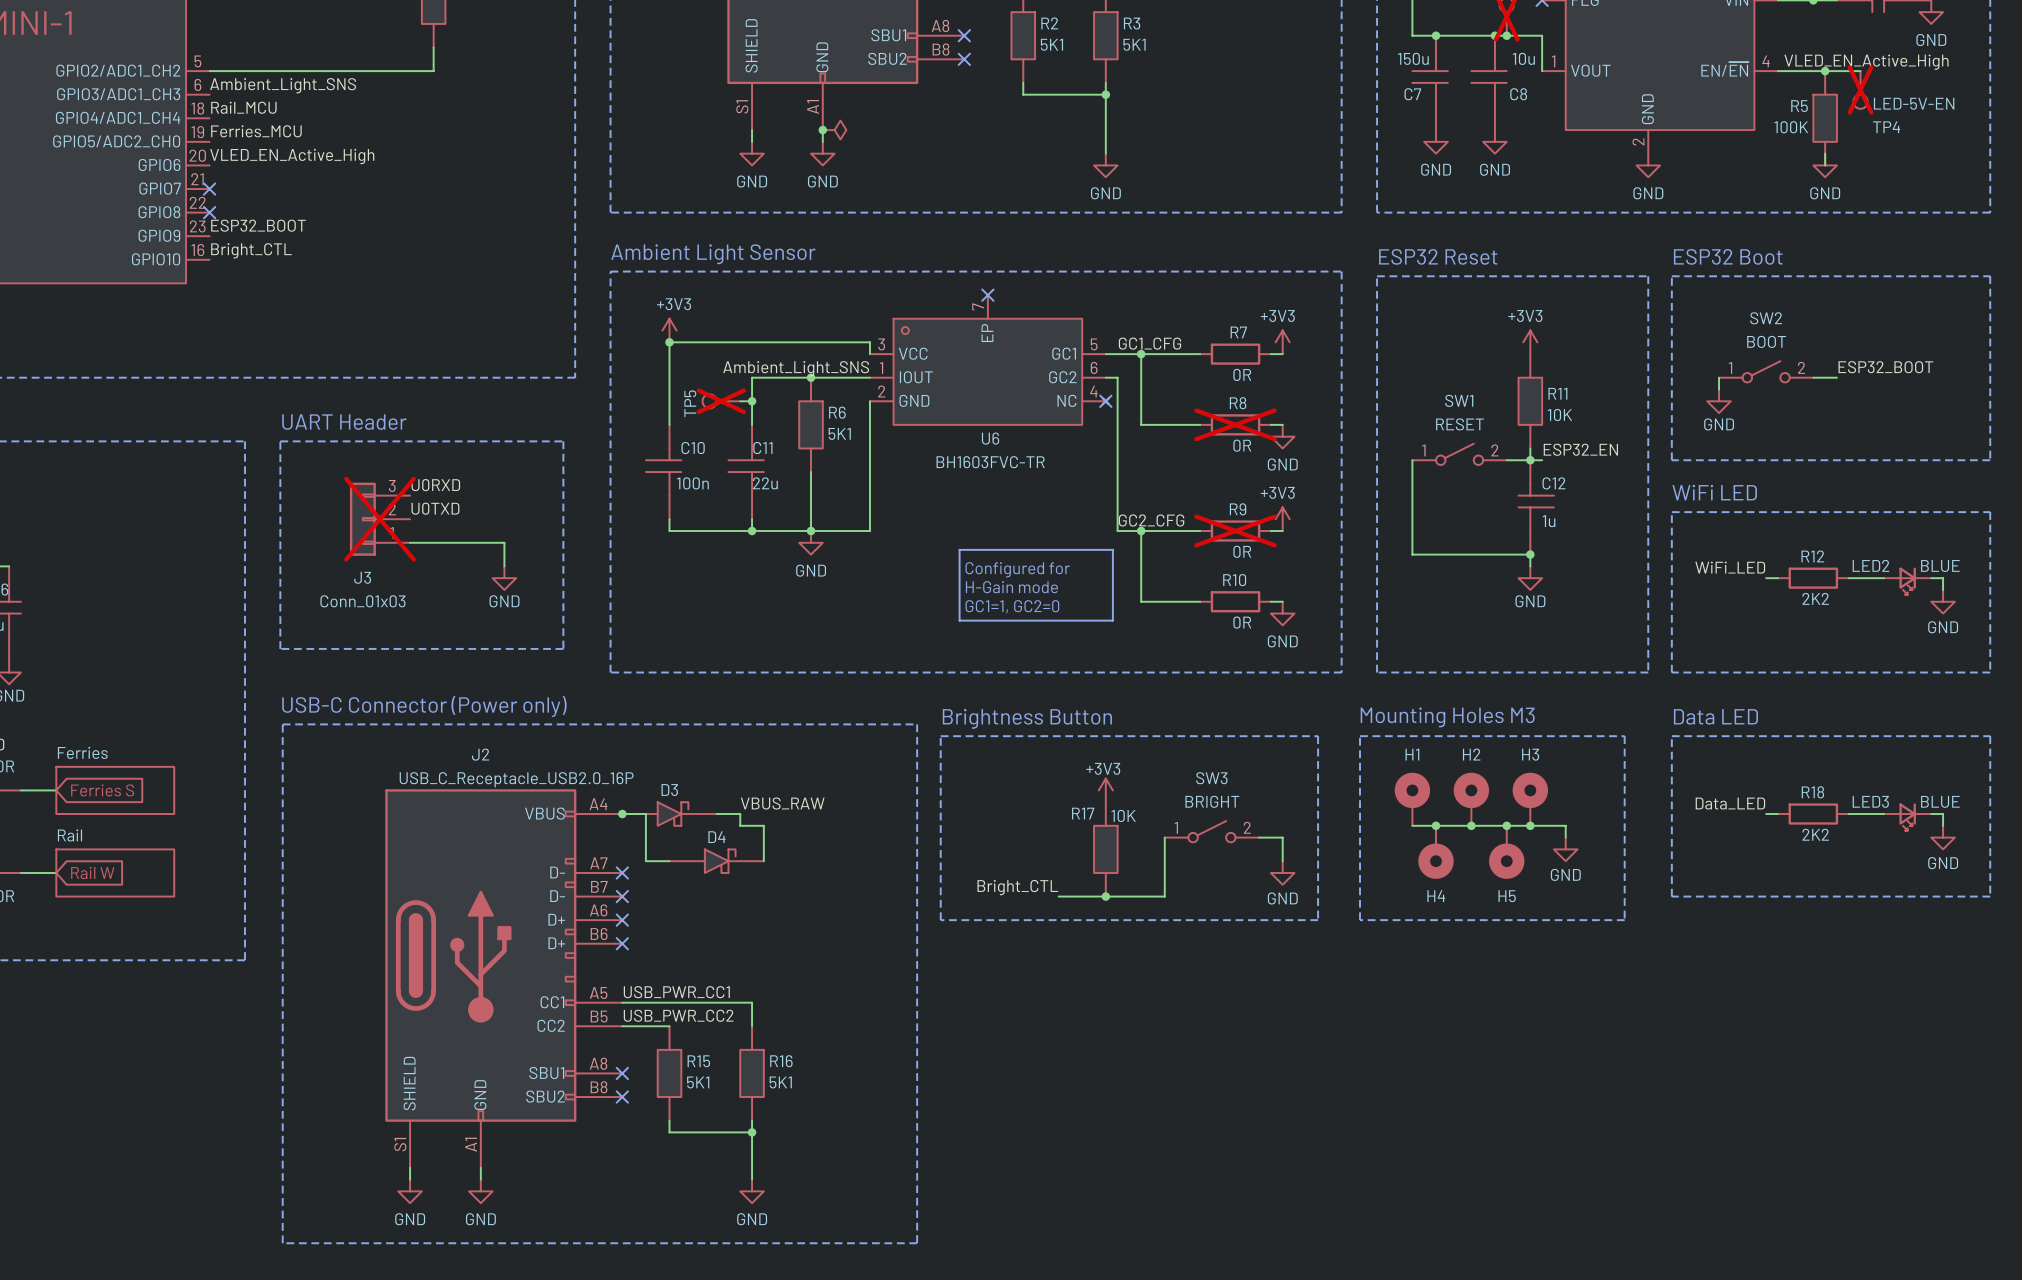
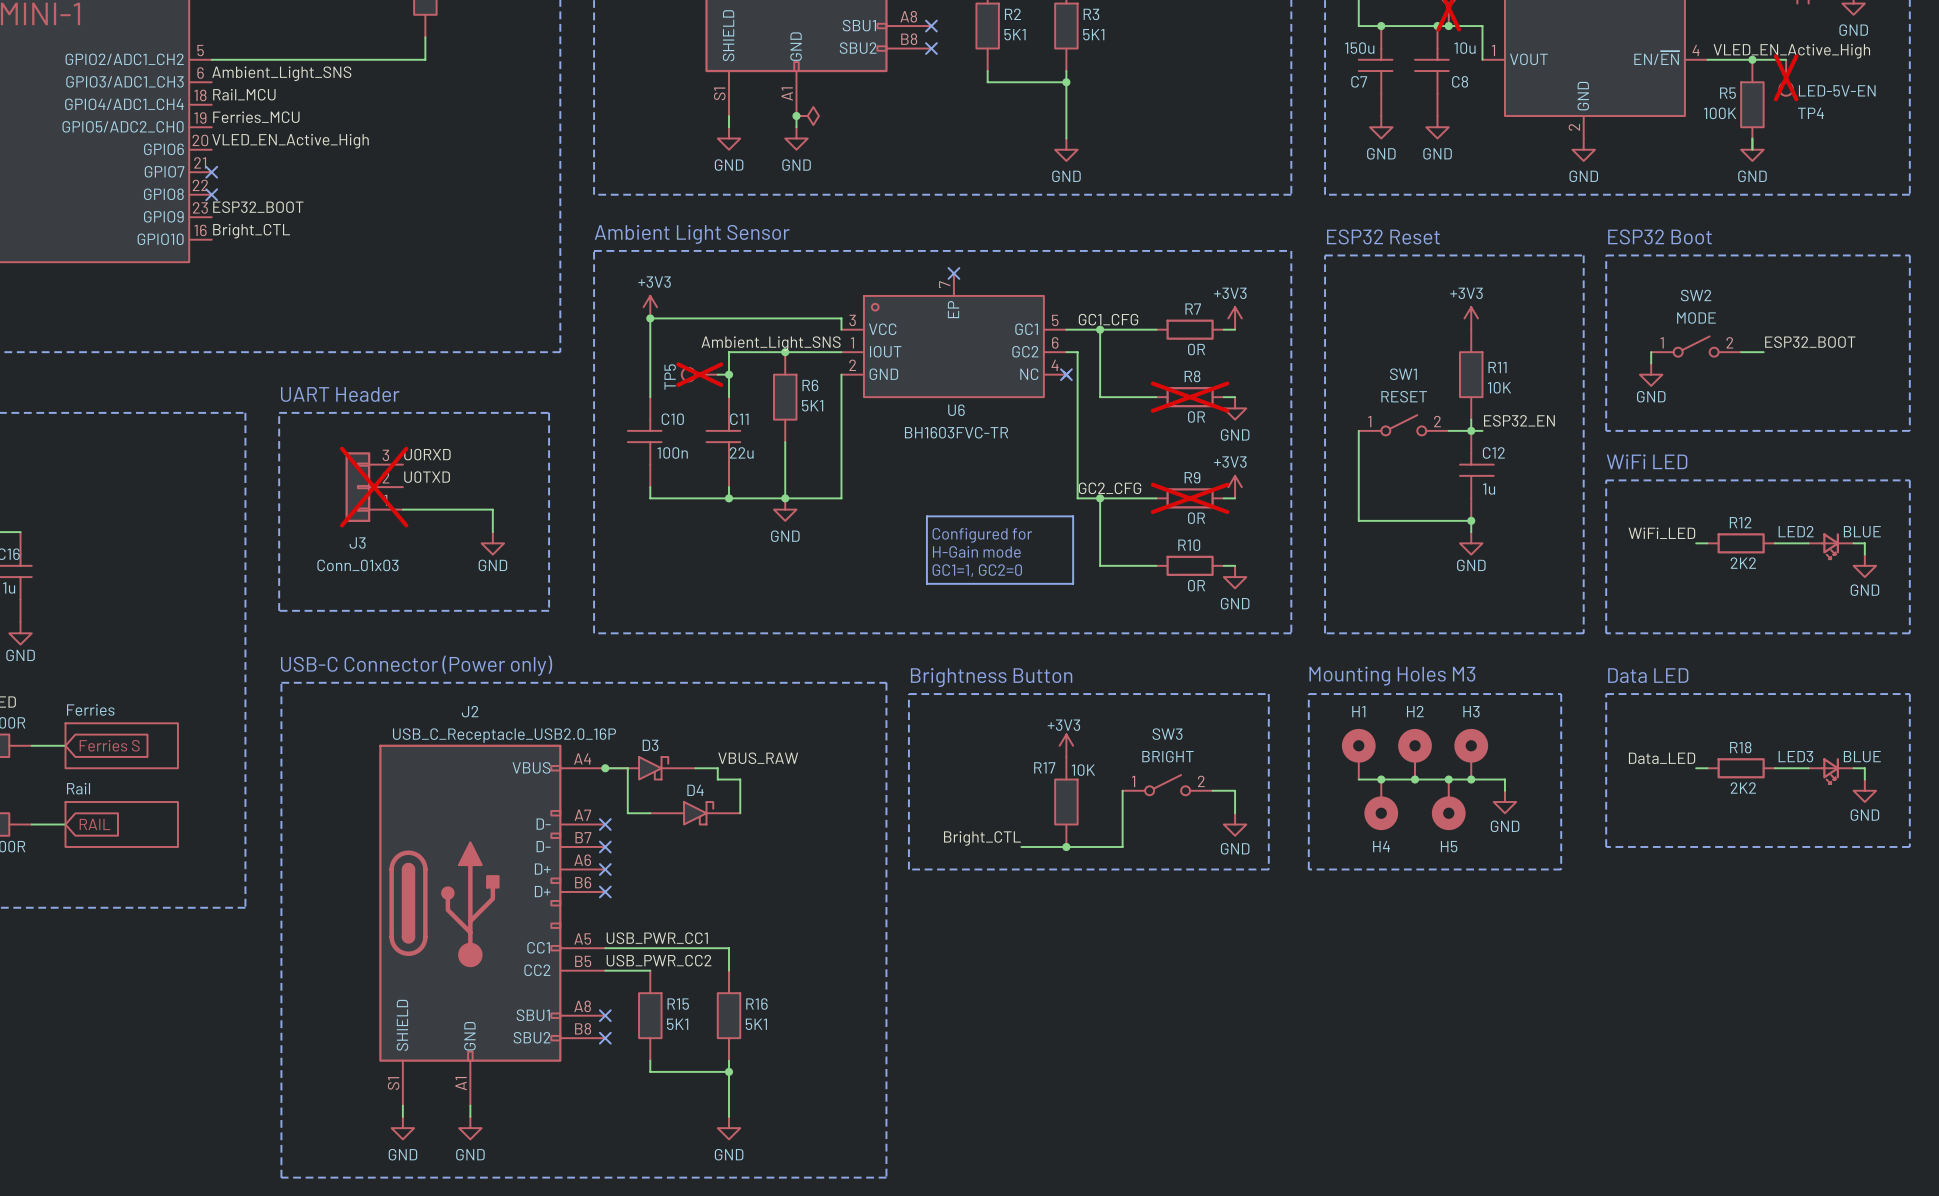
SW2 text: BOOT (1766, 341) -> MODE (1696, 318)
global label: Rail W (92, 872) -> RAIL (95, 824)

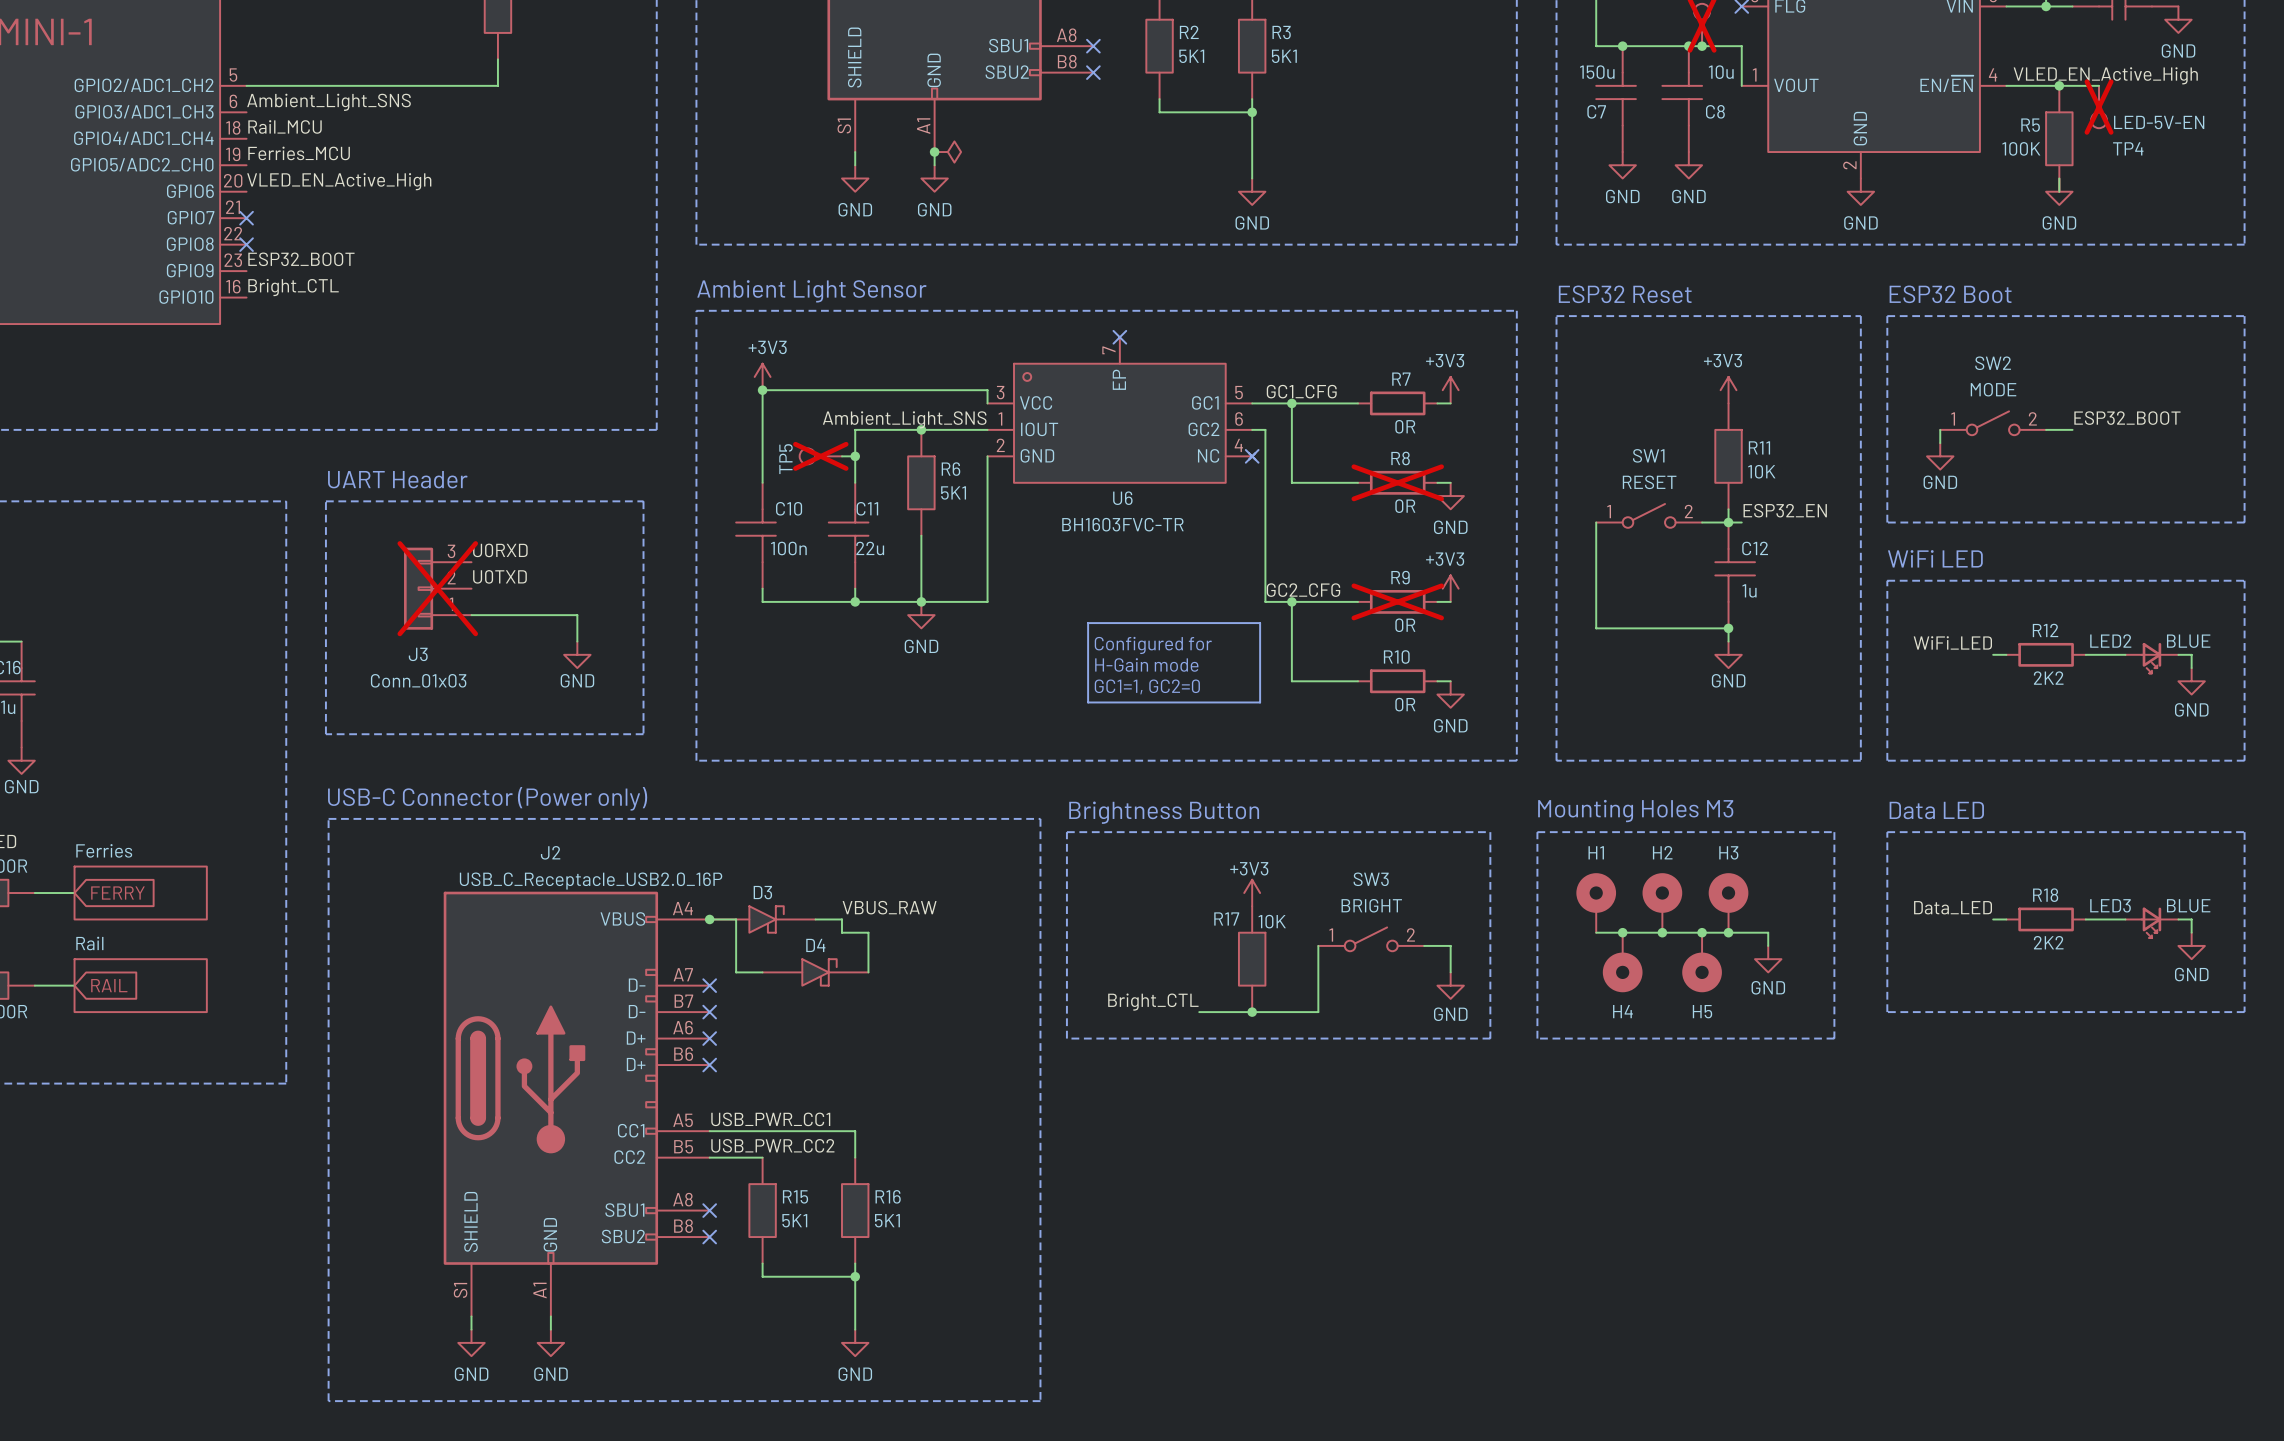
global label: Ferries S (109, 745) -> FERRY (117, 893)

